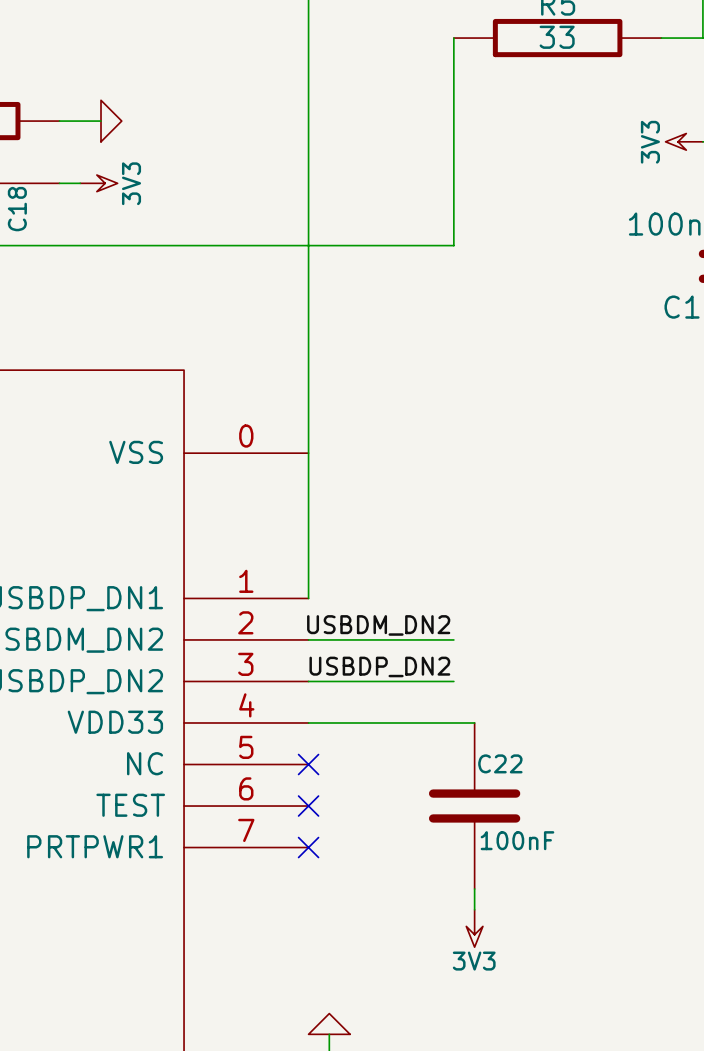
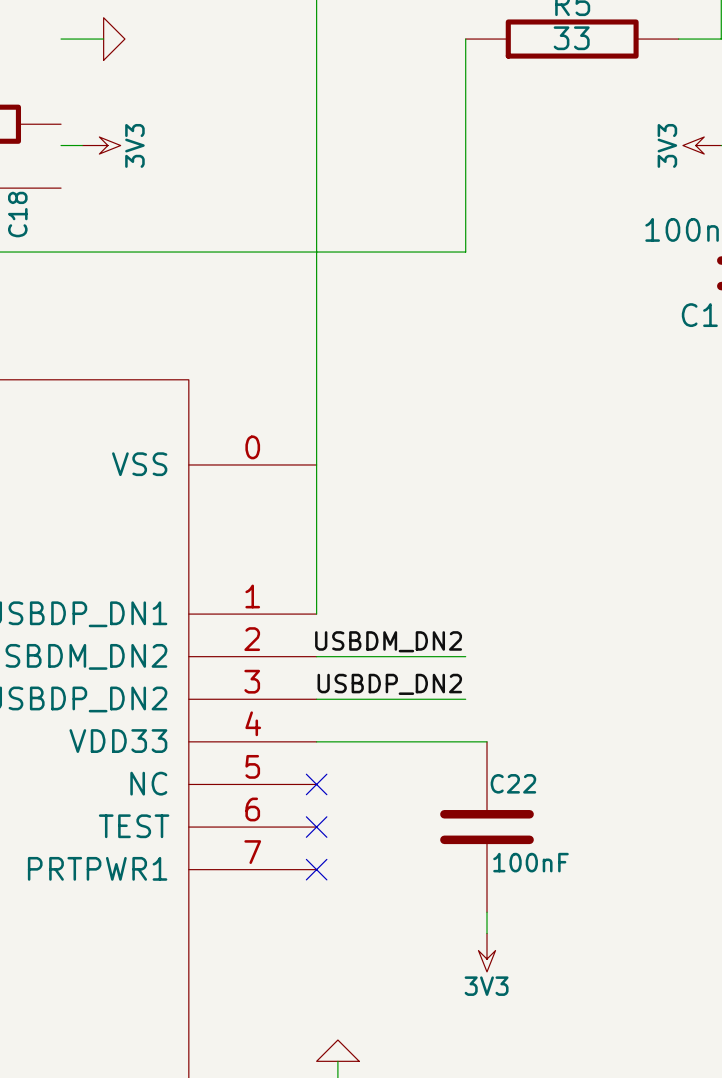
wire: (59, 121) (101, 121) -> (61, 39) (103, 39)
power symbol position: (111, 121) -> (114, 39)
wire: (59, 183) (80, 183) -> (61, 145) (82, 145)
power symbol position: 3V3 (98, 183) -> 3V3 (101, 145)

